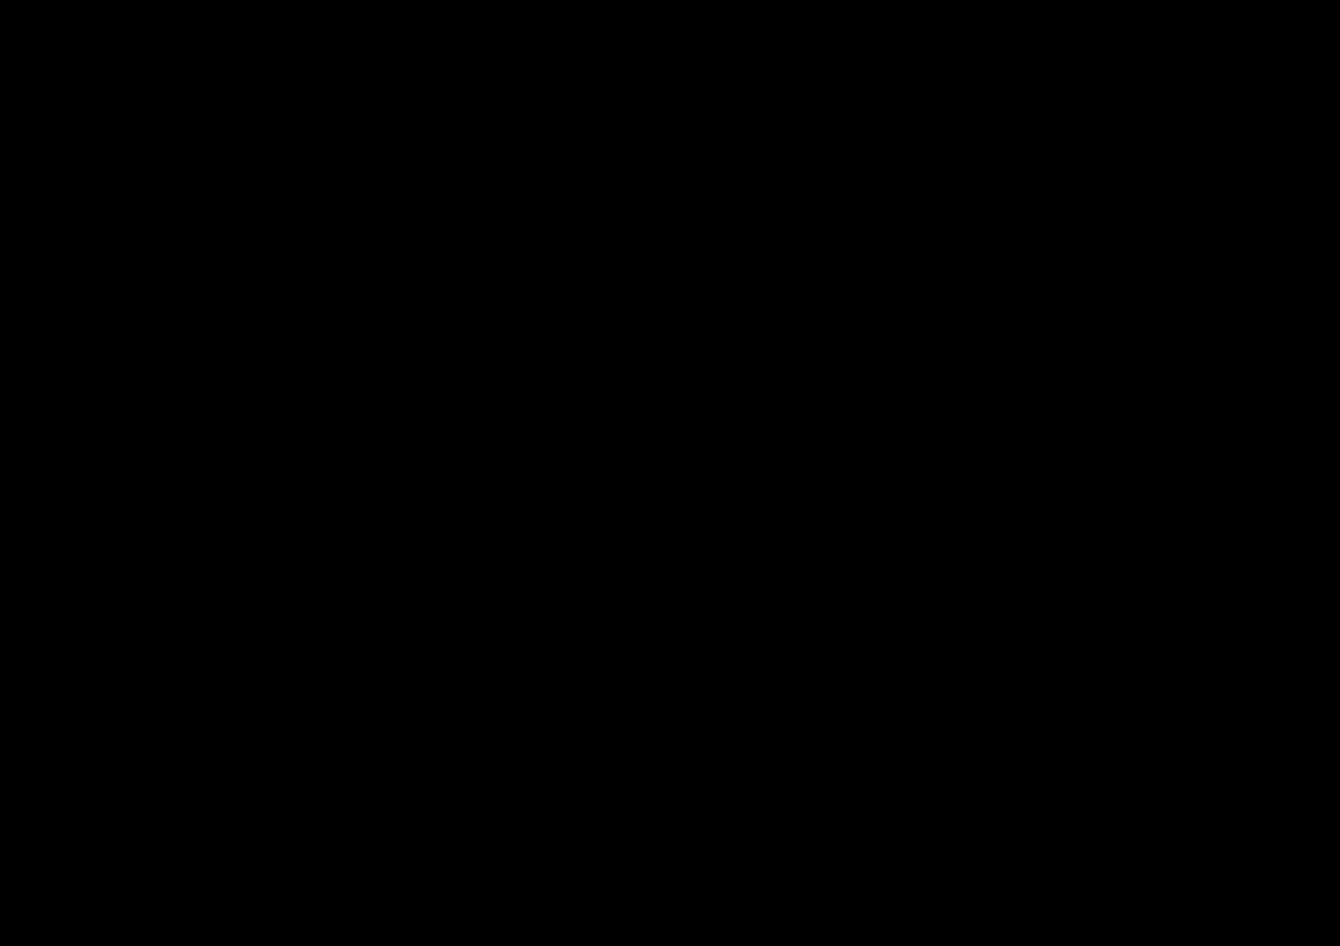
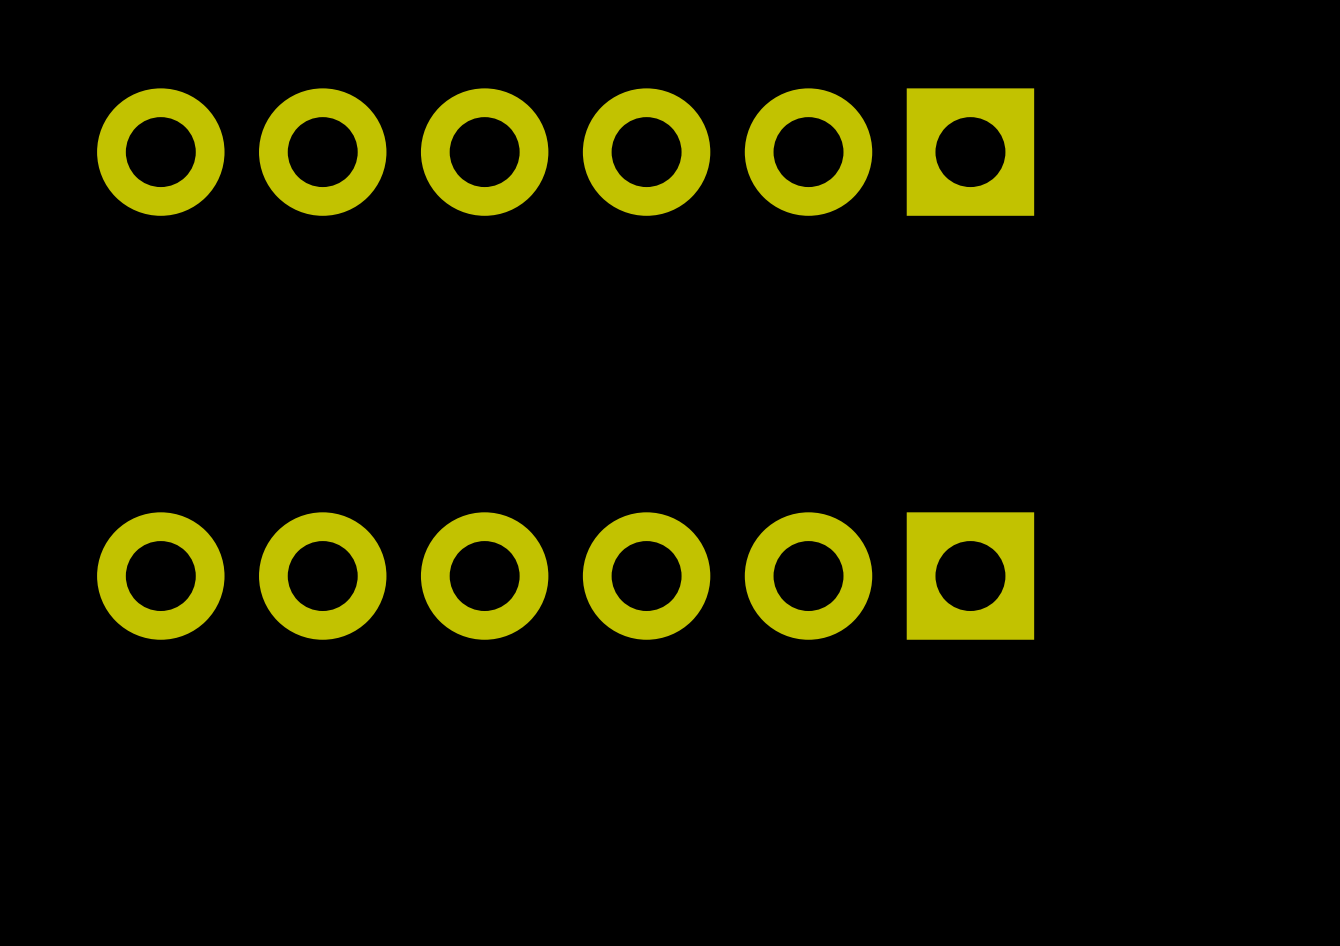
part: none -> (565, 152)
part: none -> (565, 576)

